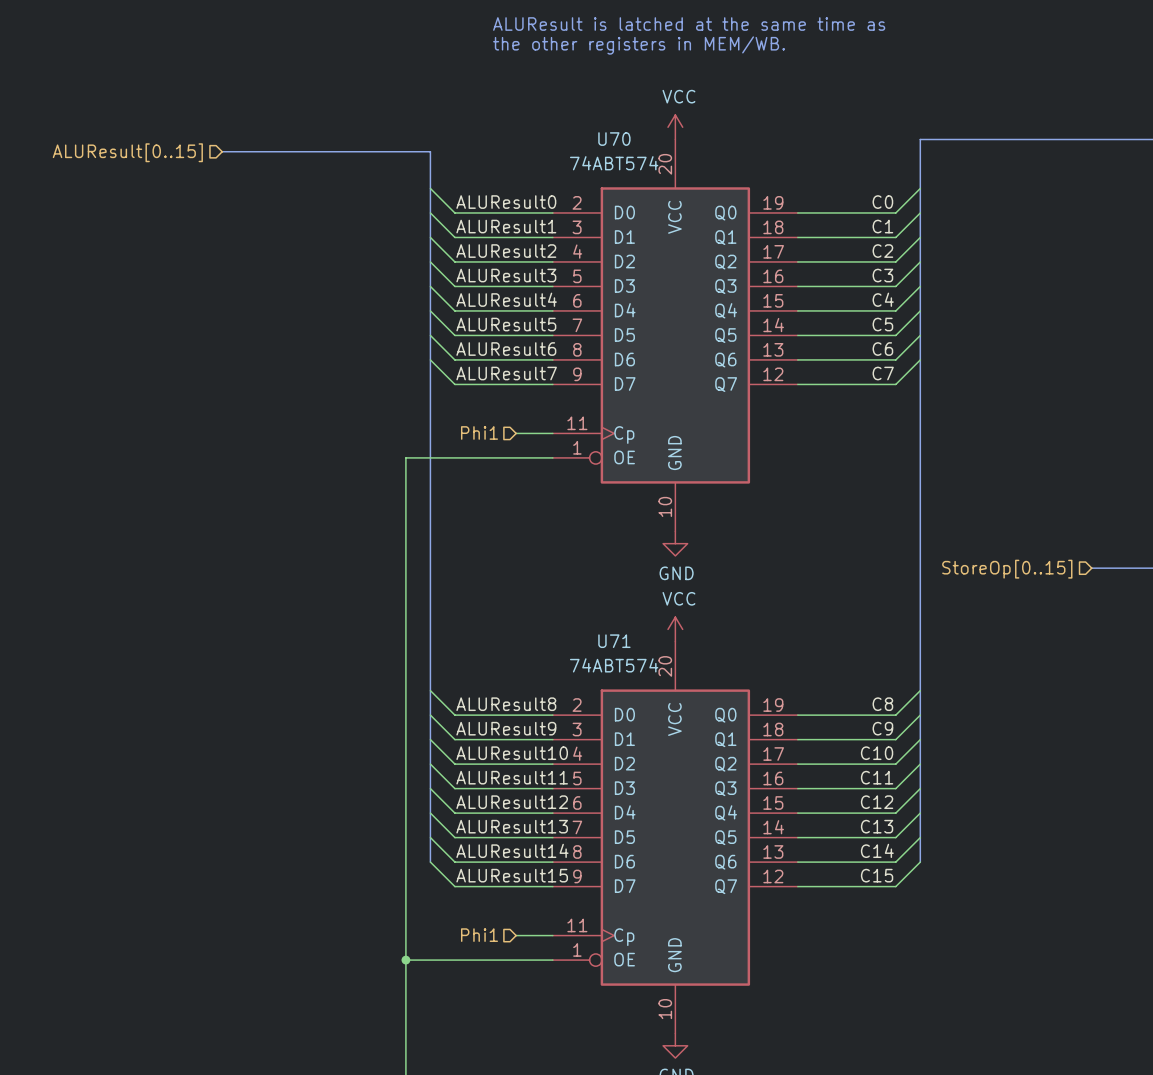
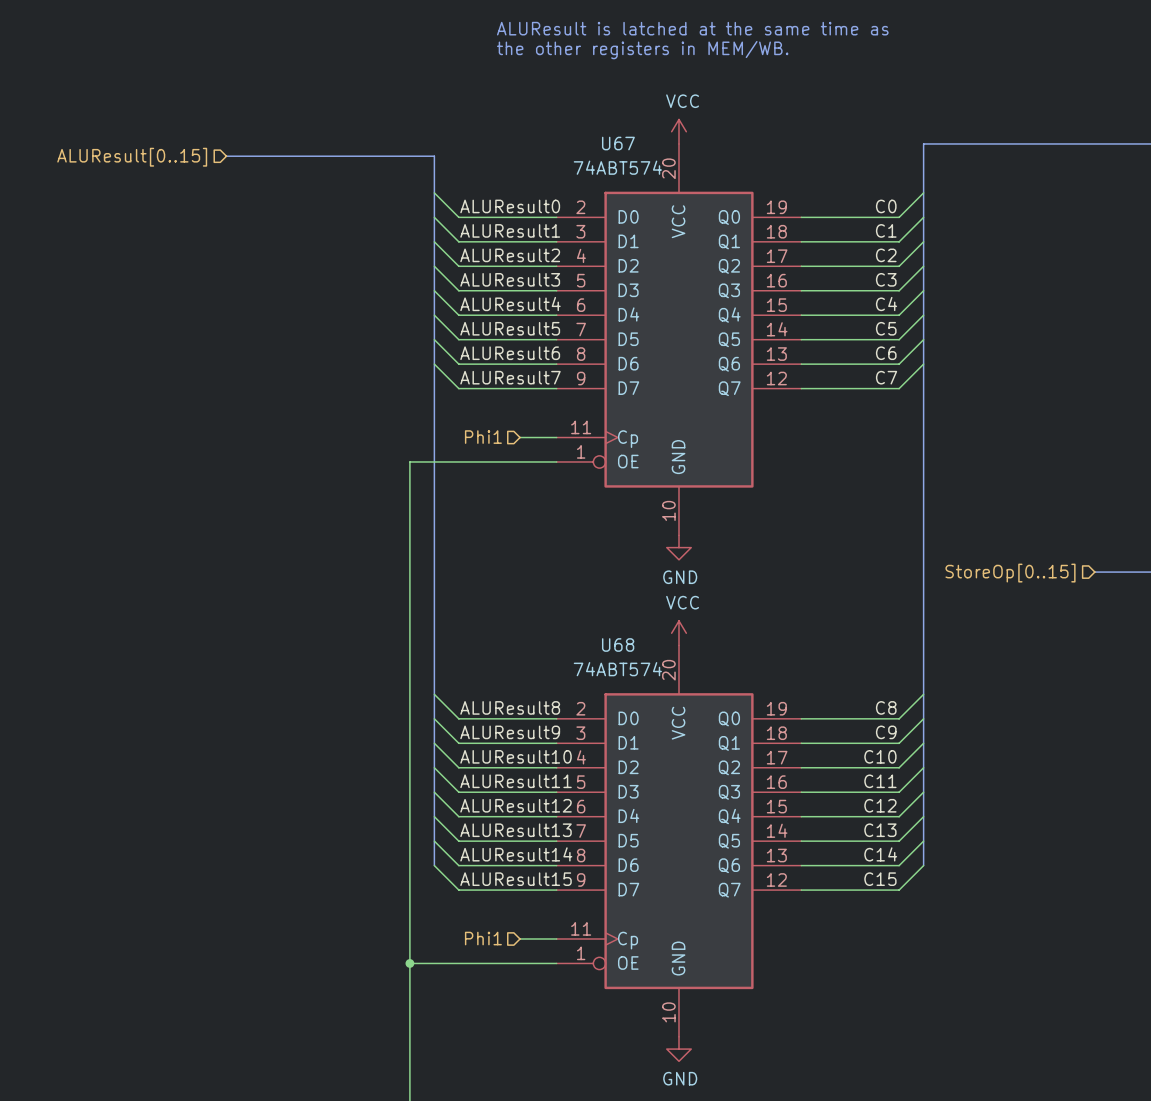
U70 name: U70 (614, 139) -> U67 (618, 143)
U71 name: U71 (614, 641) -> U68 (618, 644)

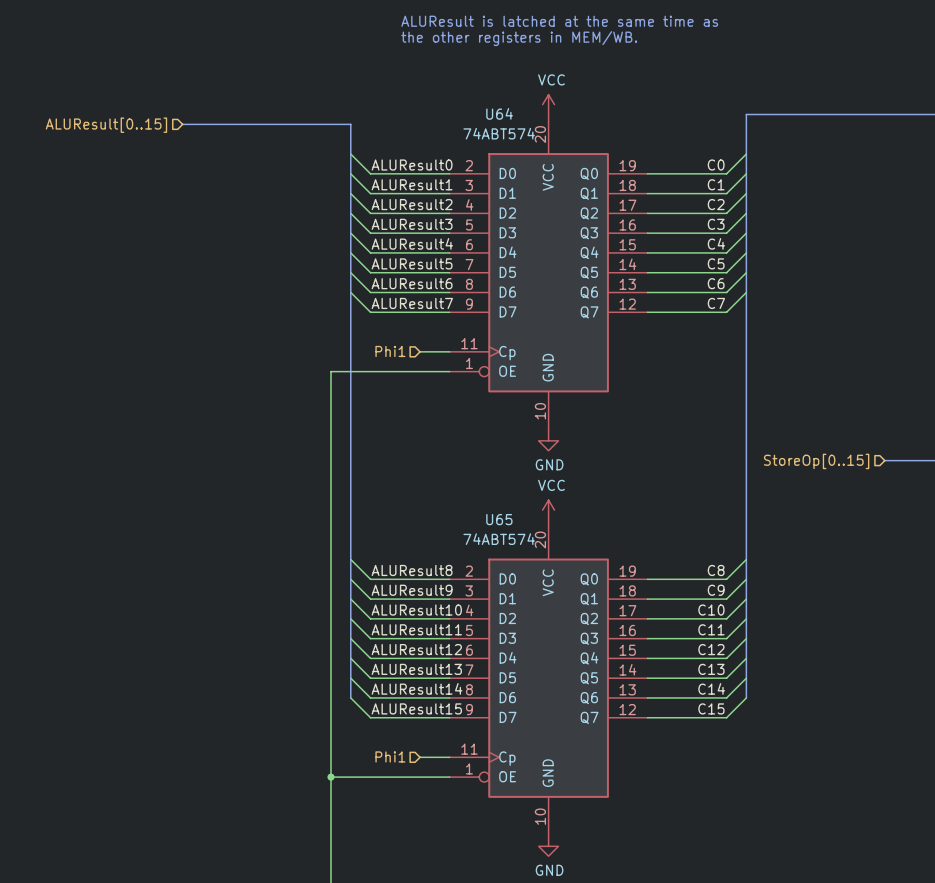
U67 name: U67 (618, 143) -> U64 (499, 113)
U68 name: U68 (618, 644) -> U65 (499, 519)

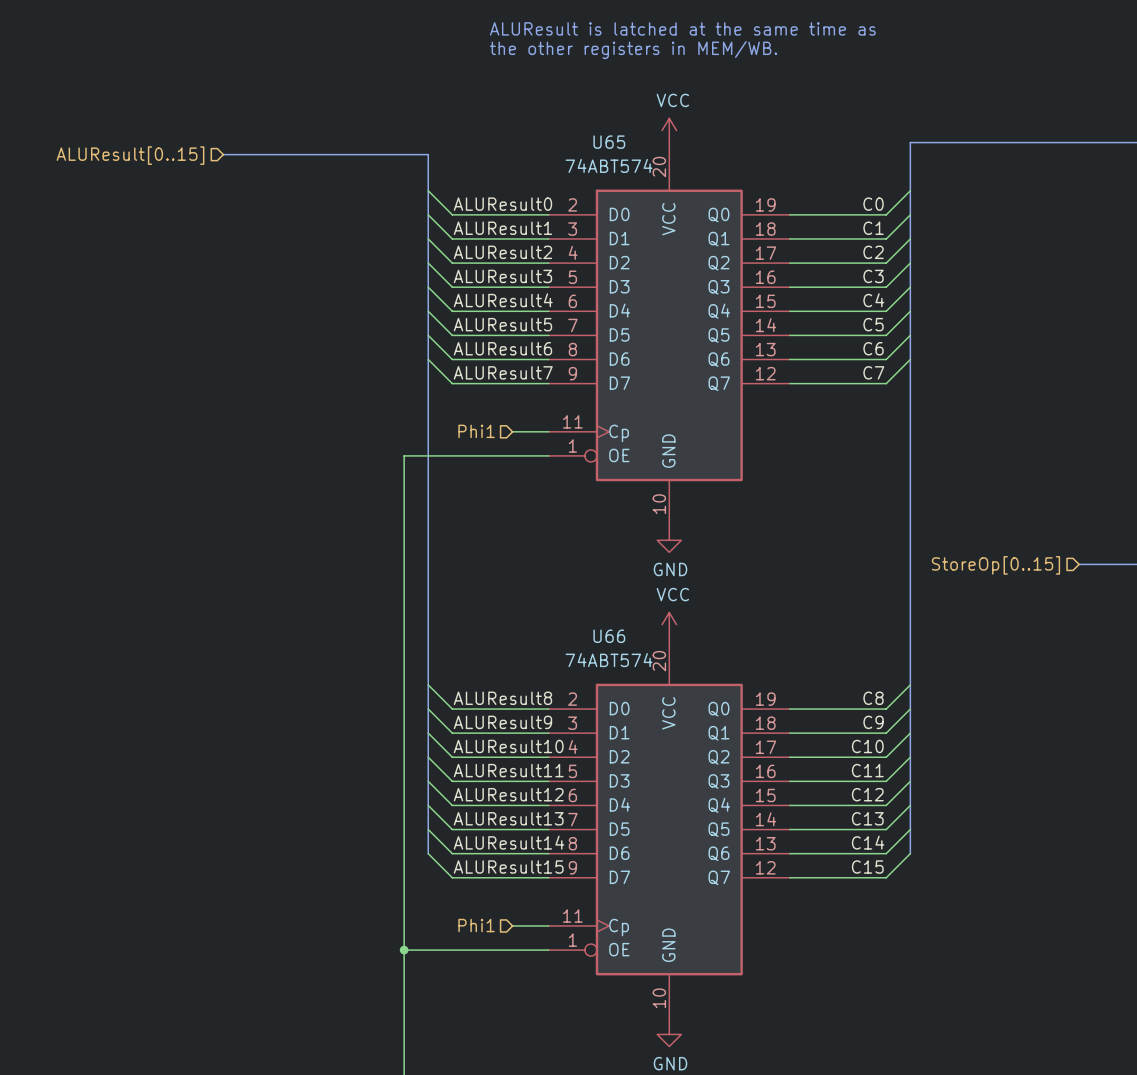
U64 name: U64 (499, 113) -> U65 (609, 142)
U65 name: U65 (499, 519) -> U66 (609, 636)

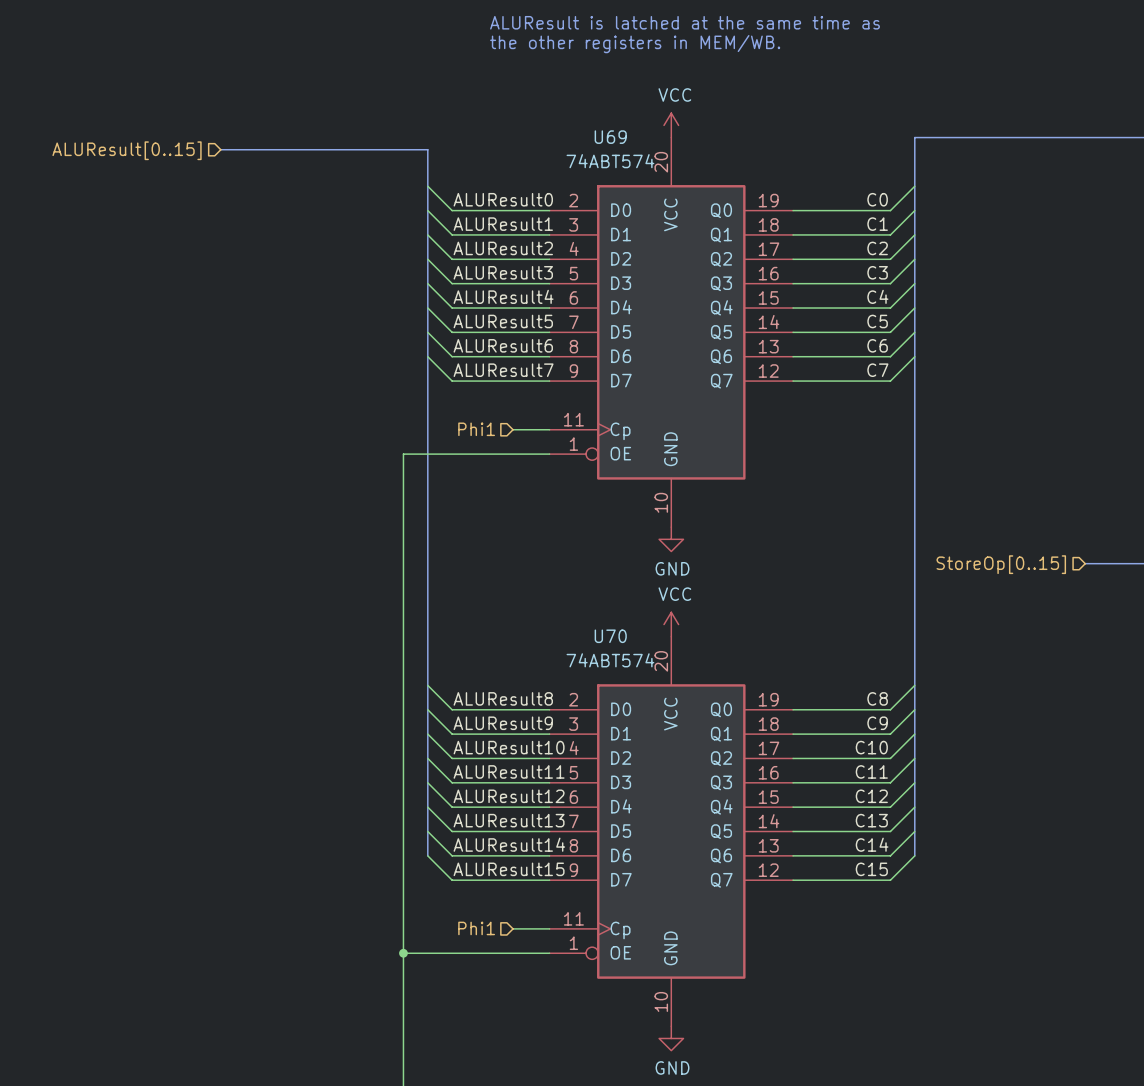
U65 name: U65 (609, 142) -> U69 (610, 137)
U66 name: U66 (609, 636) -> U70 (610, 636)

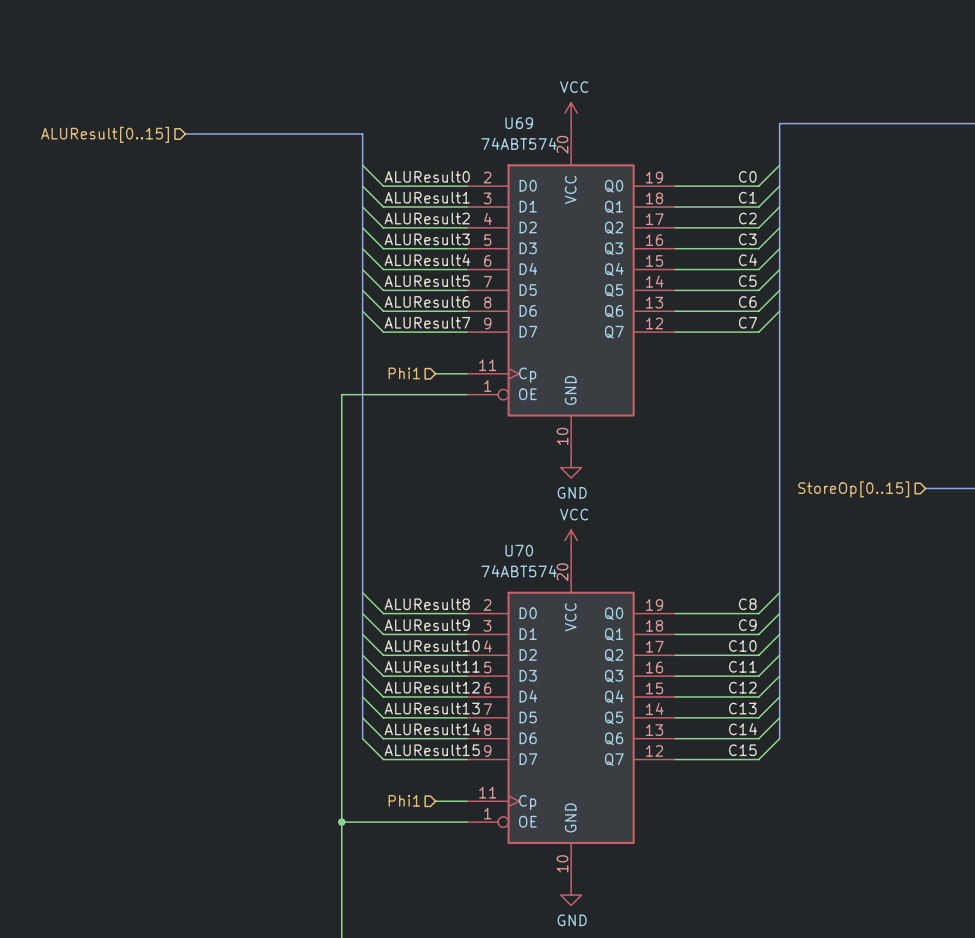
text: ALUResult is latched at the same time as (685, 22) -> none
text: the other registers in MEM/WB. (635, 44) -> none

